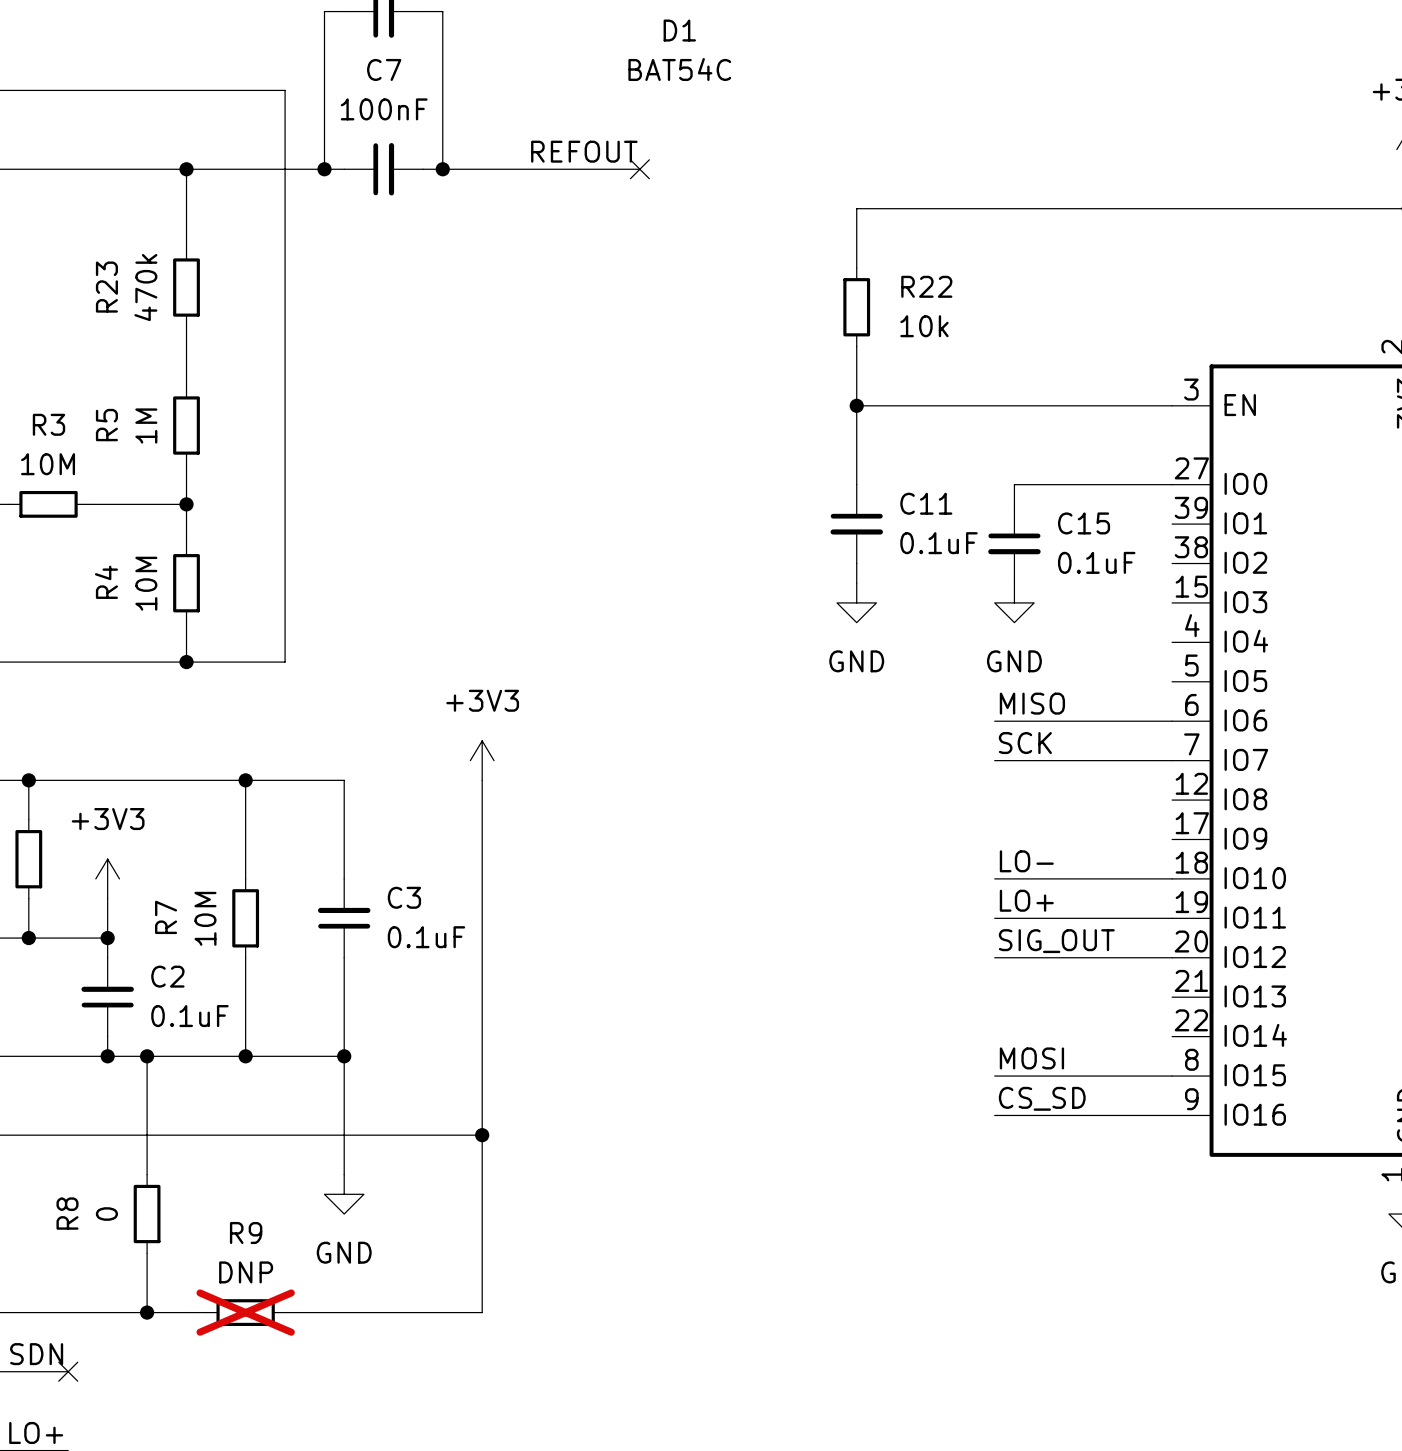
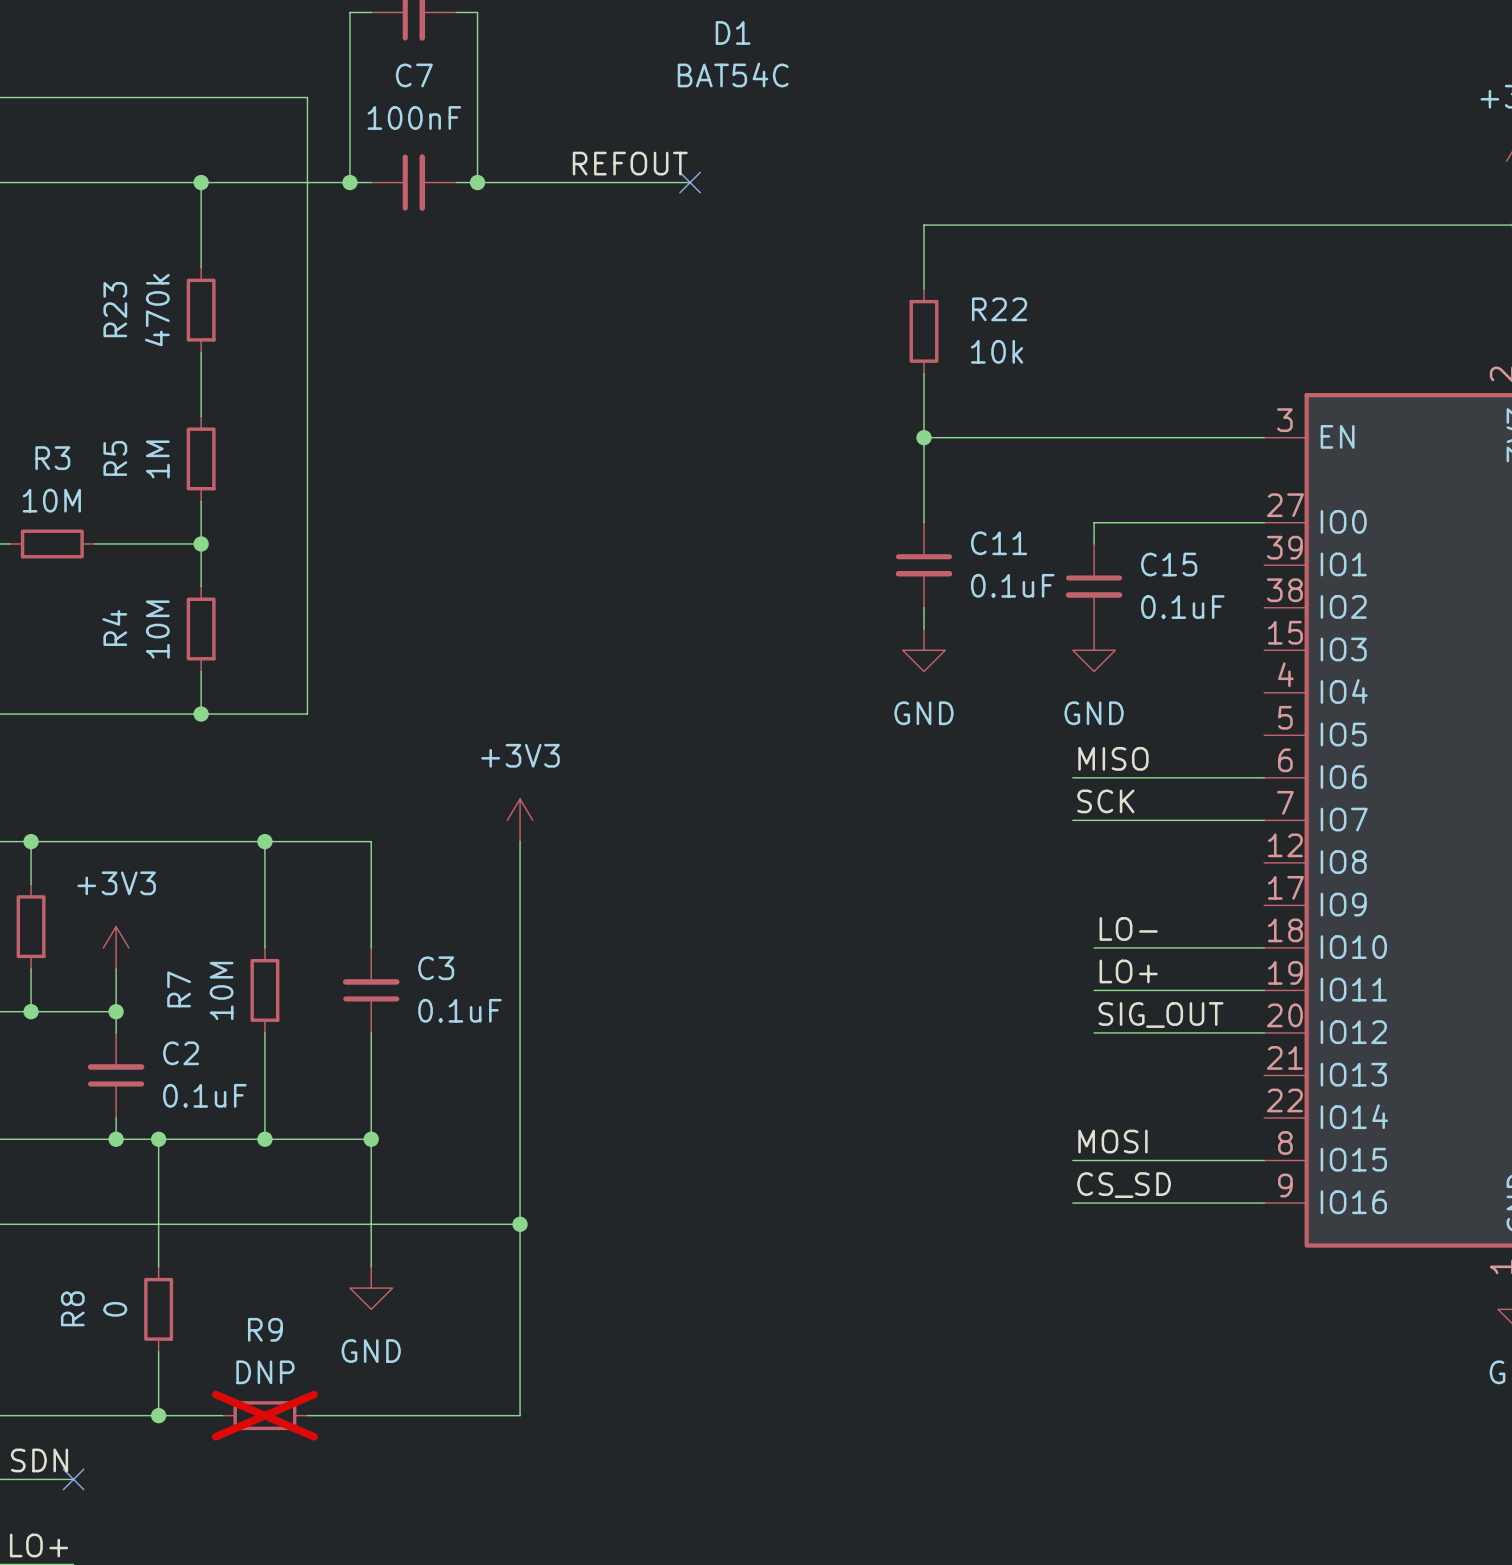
label position: LO- (1026, 861) -> LO- (1128, 928)
wire: (994, 878) (1014, 878) -> none
label position: LO+ (1026, 900) -> LO+ (1128, 971)
wire: (994, 918) (1014, 918) -> none
label position: SIG_OUT (1056, 941) -> SIG_OUT (1161, 1014)
wire: (994, 957) (1014, 957) -> none

